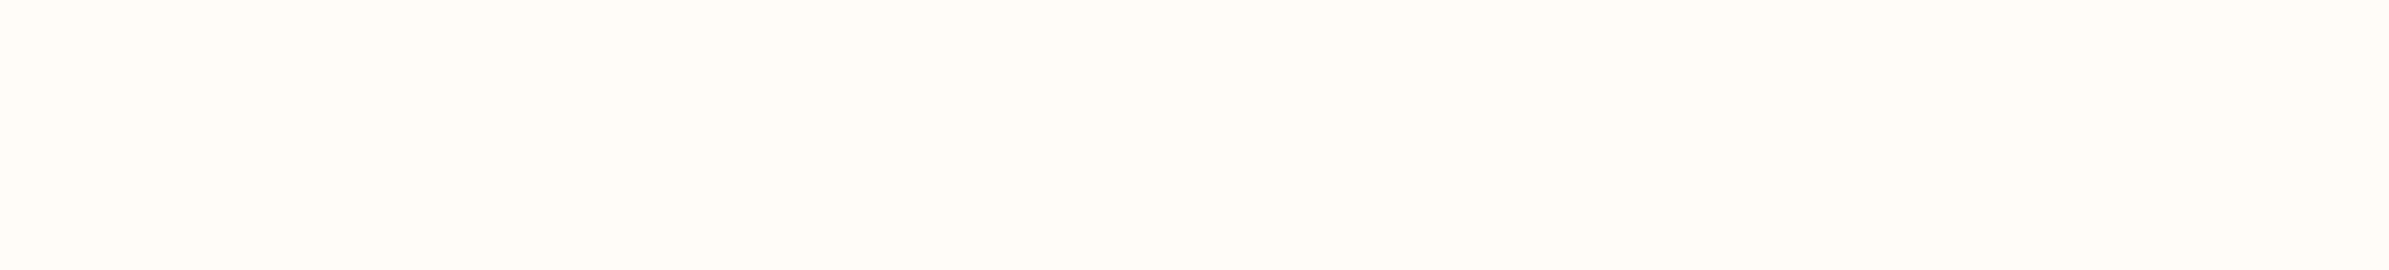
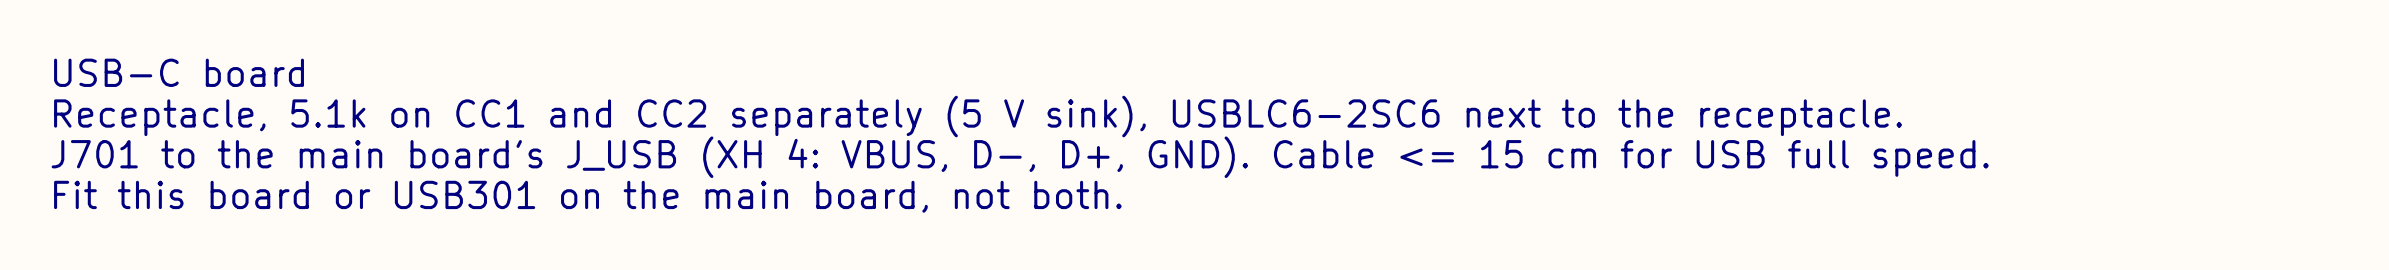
text: none -> USB-C board (179, 72)
text: none -> Receptacle, 5.1k on CC1 and CC2 separately (5 V sink), USBLC6-2SC6 next to the receptacle. (978, 116)
text: none -> J701 to the main board's J_USB (XH 4: VBUS, D-, D+, GND). Cable <= 15 cm for USB full speed. (1020, 157)
text: none -> Fit this board or USB301 on the main board, not both. (587, 196)

